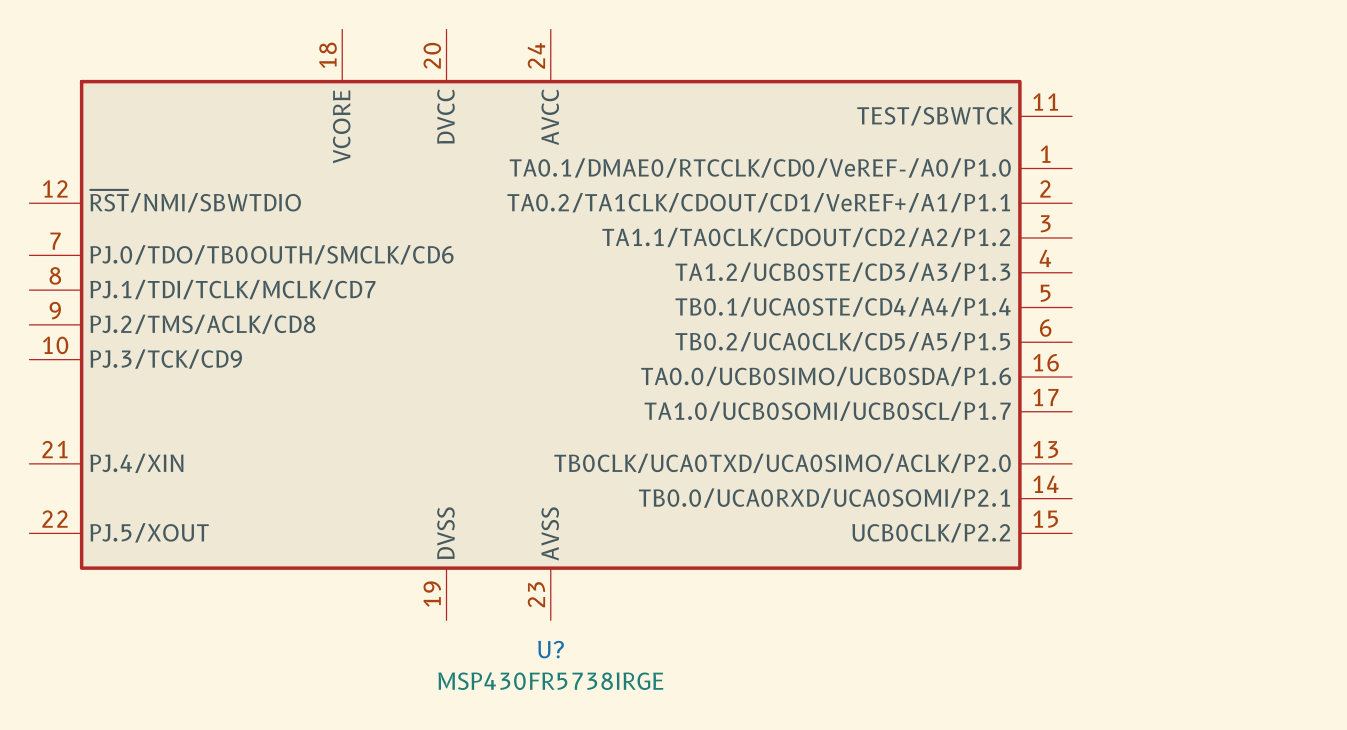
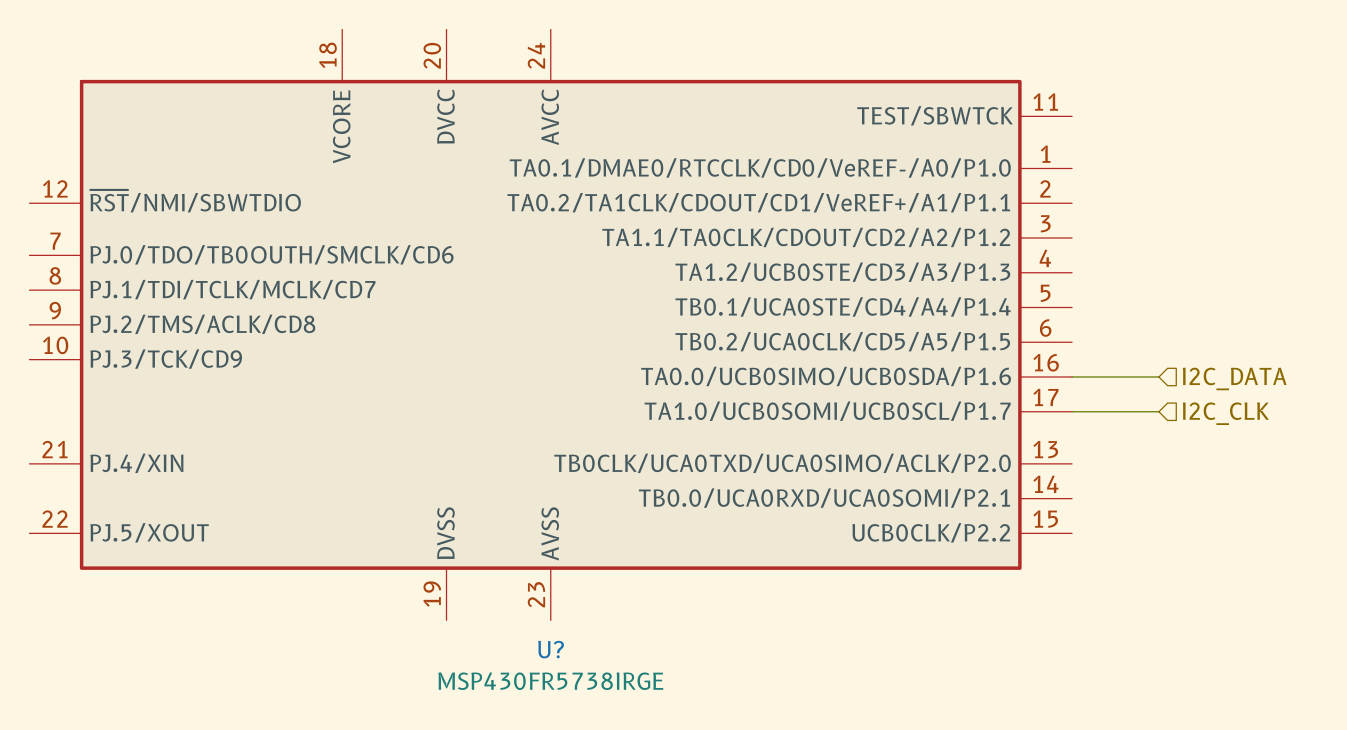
wire: none -> (1072, 377) (1158, 377)
hierarchical label: none -> I2C_DATA (1234, 378)
wire: none -> (1072, 411) (1158, 411)
hierarchical label: none -> I2C_CLK (1225, 413)

